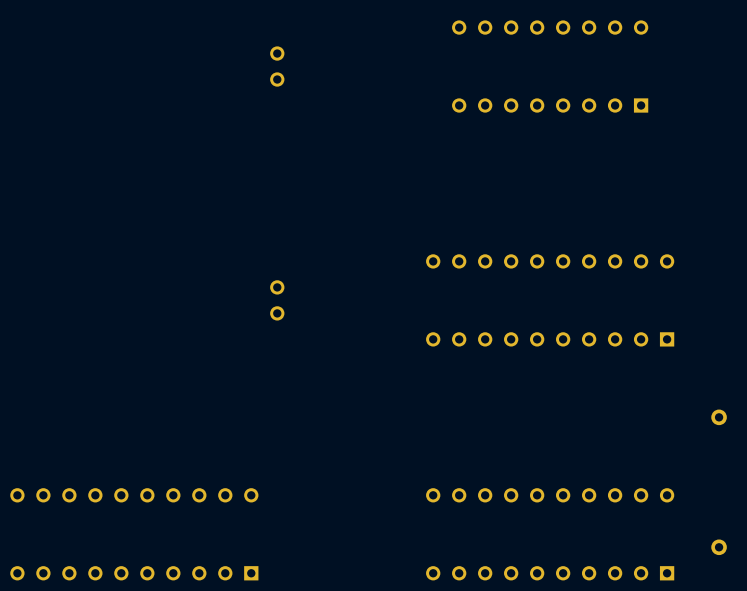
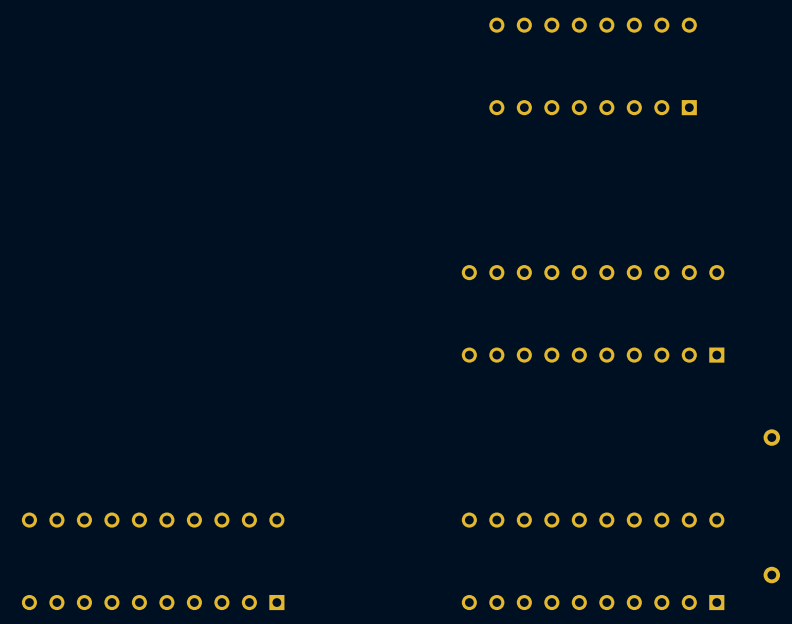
part: (277, 66) -> none
part: (277, 300) -> none

